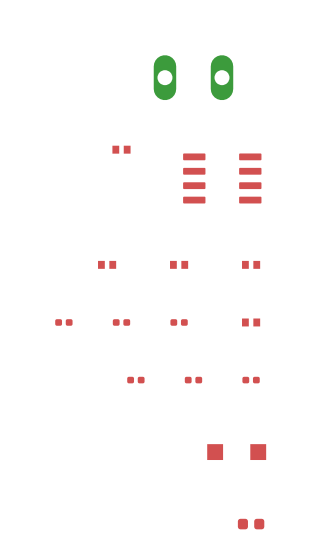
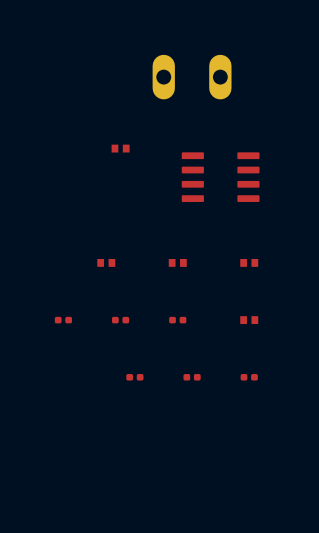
part: (236, 452) -> none
part: (251, 524) -> none

